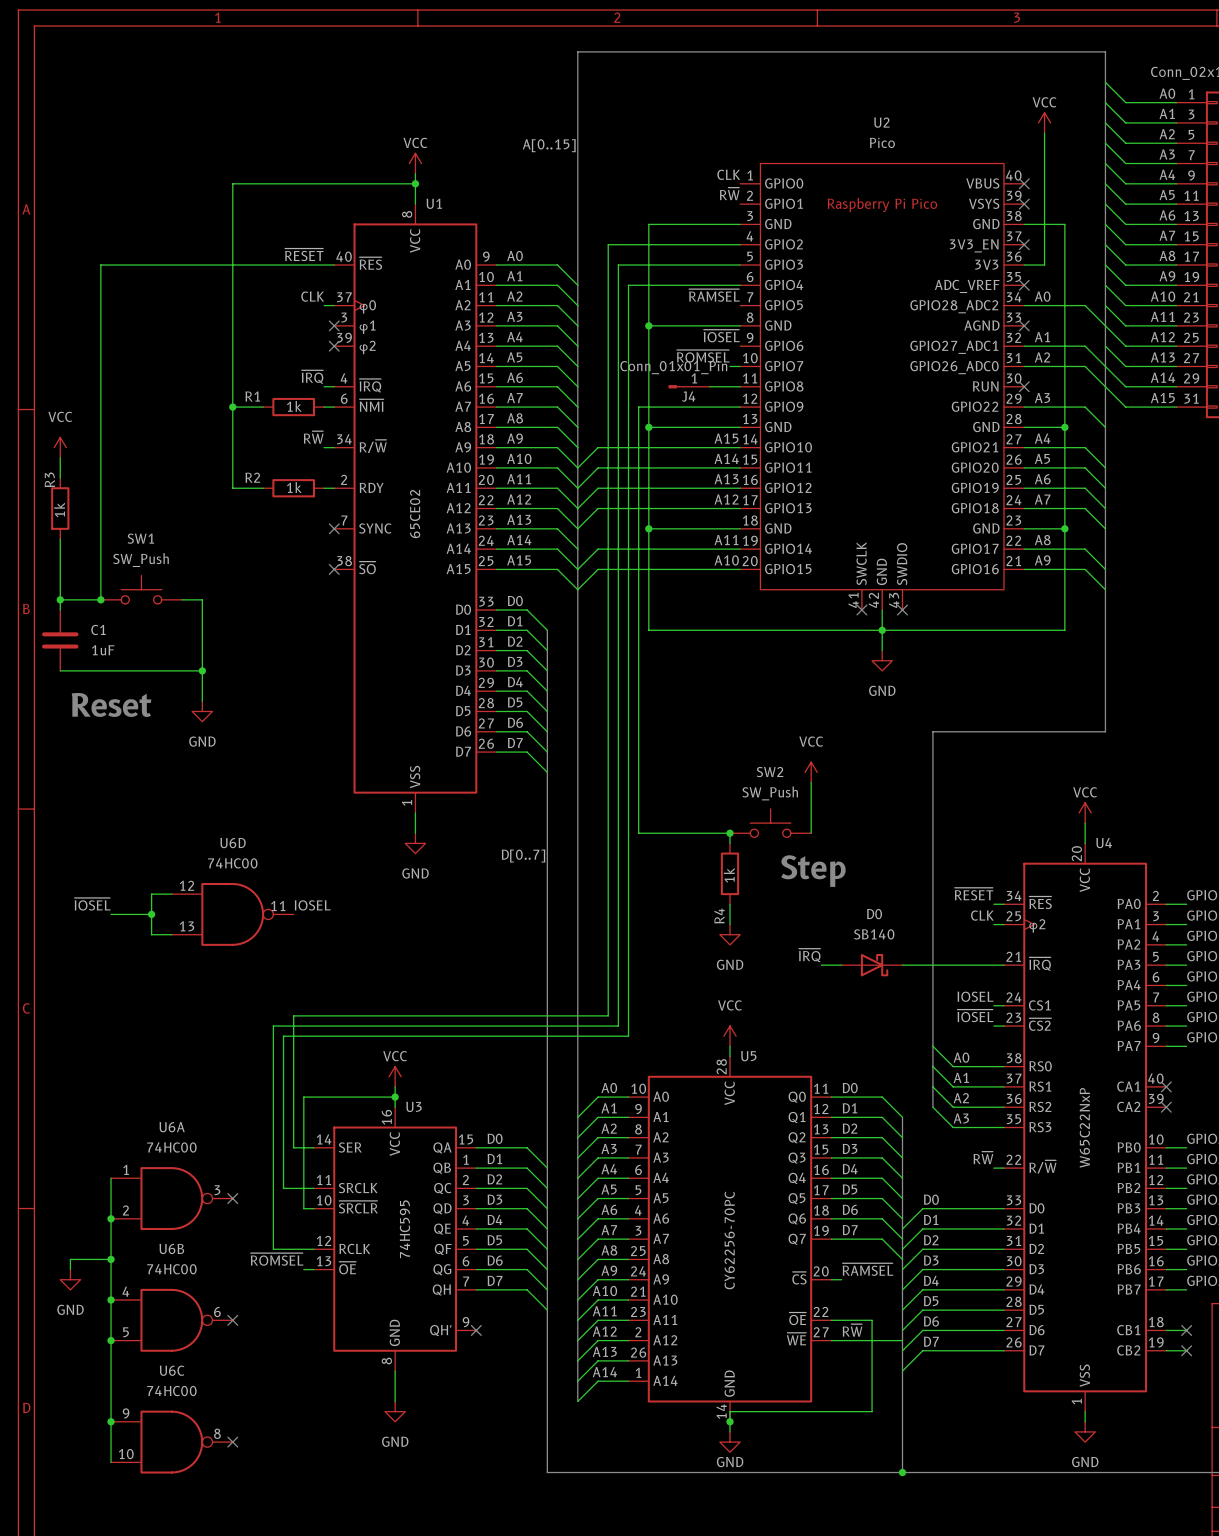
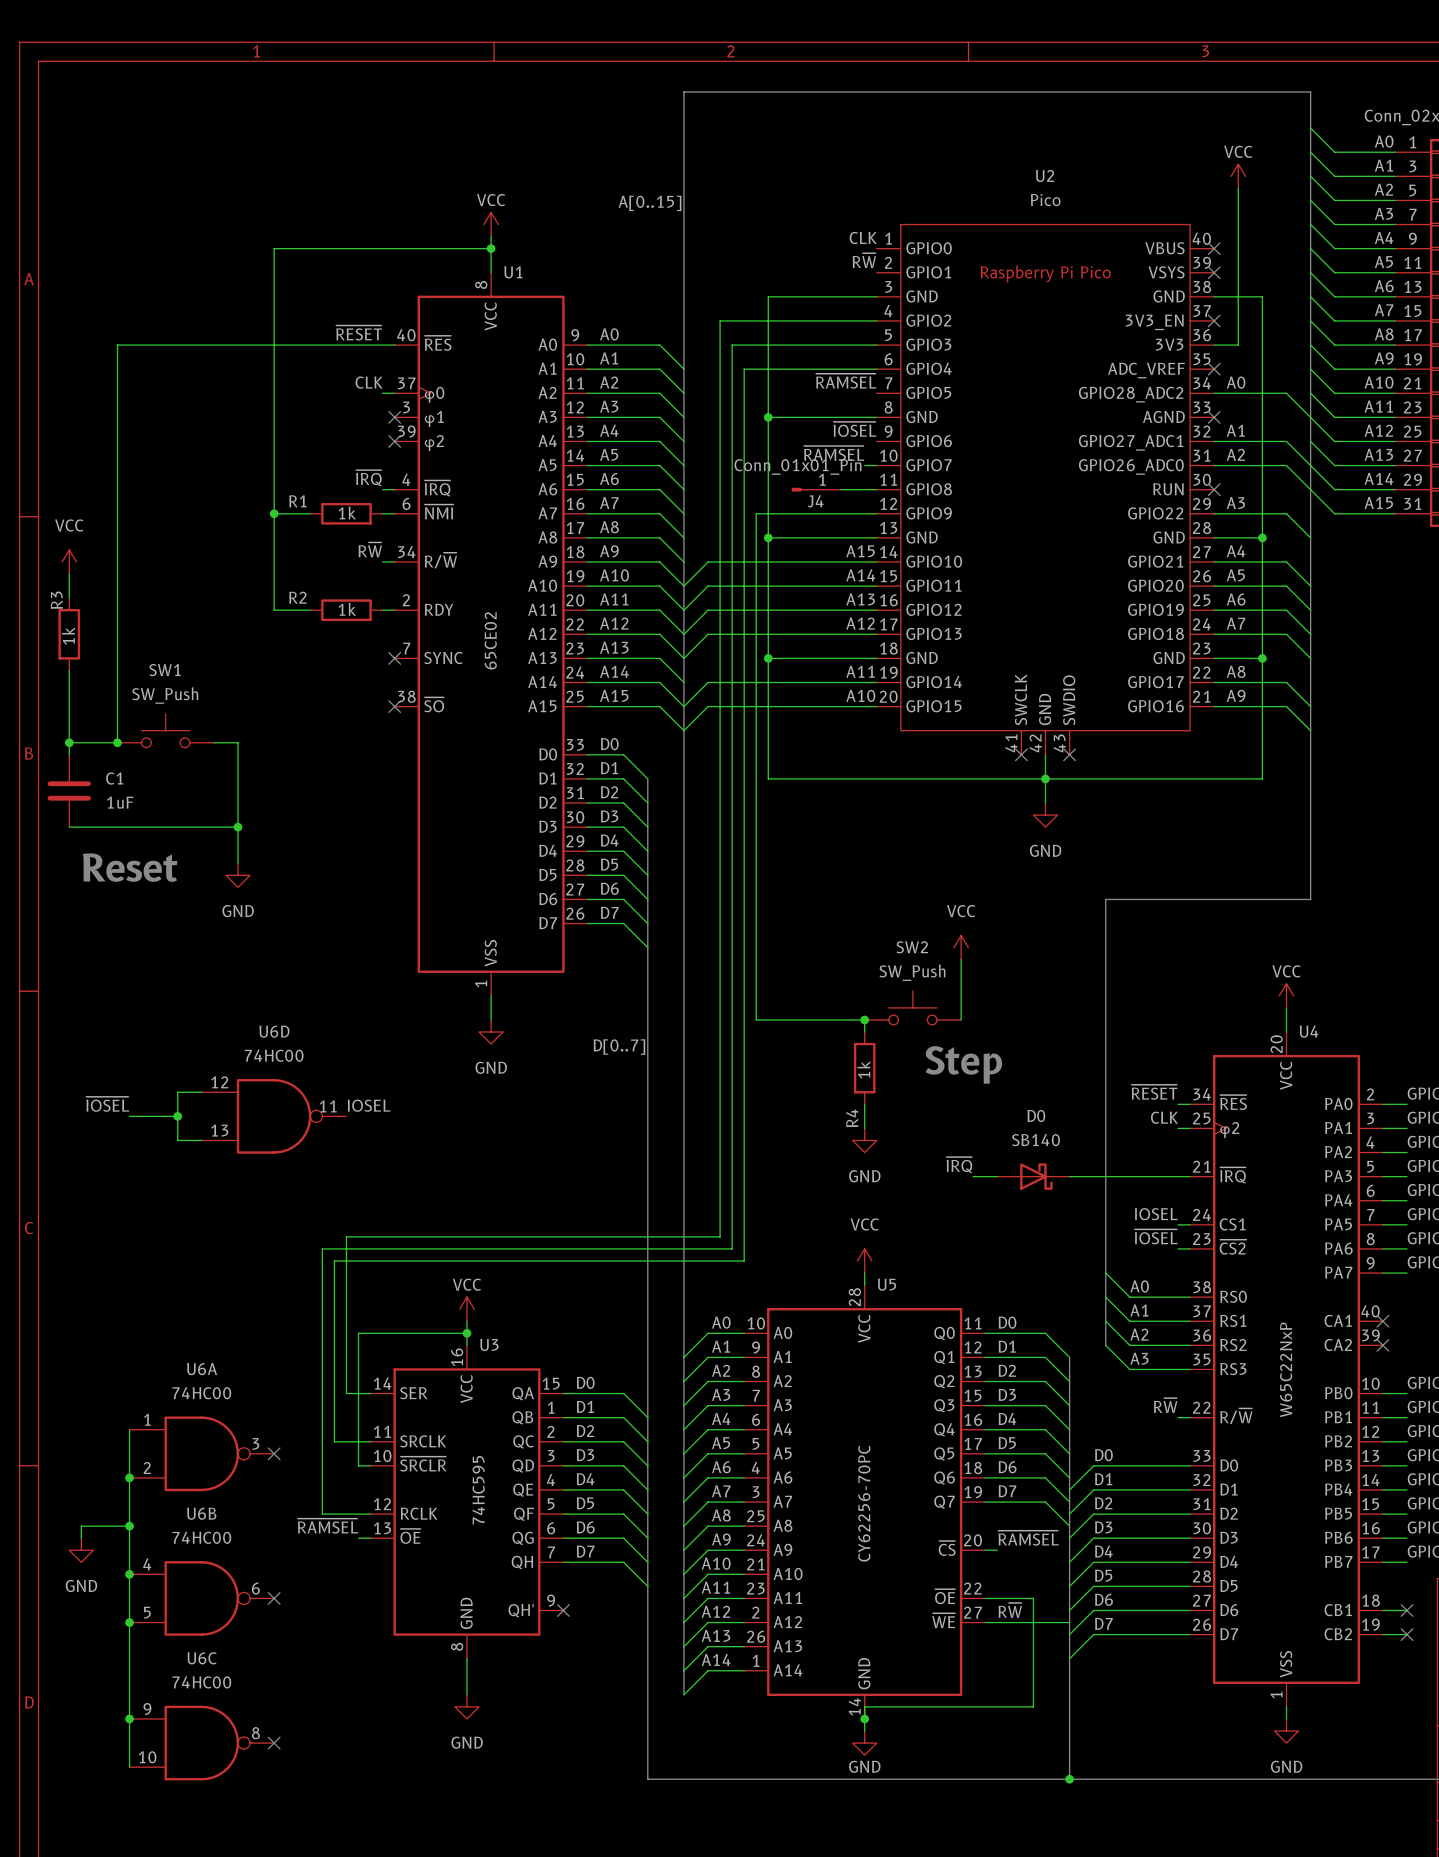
label: ~{ROMSEL} (703, 356) -> ~{RAMSEL} (834, 453)
label: ~{ROMSEL} (277, 1259) -> ~{RAMSEL} (327, 1526)

